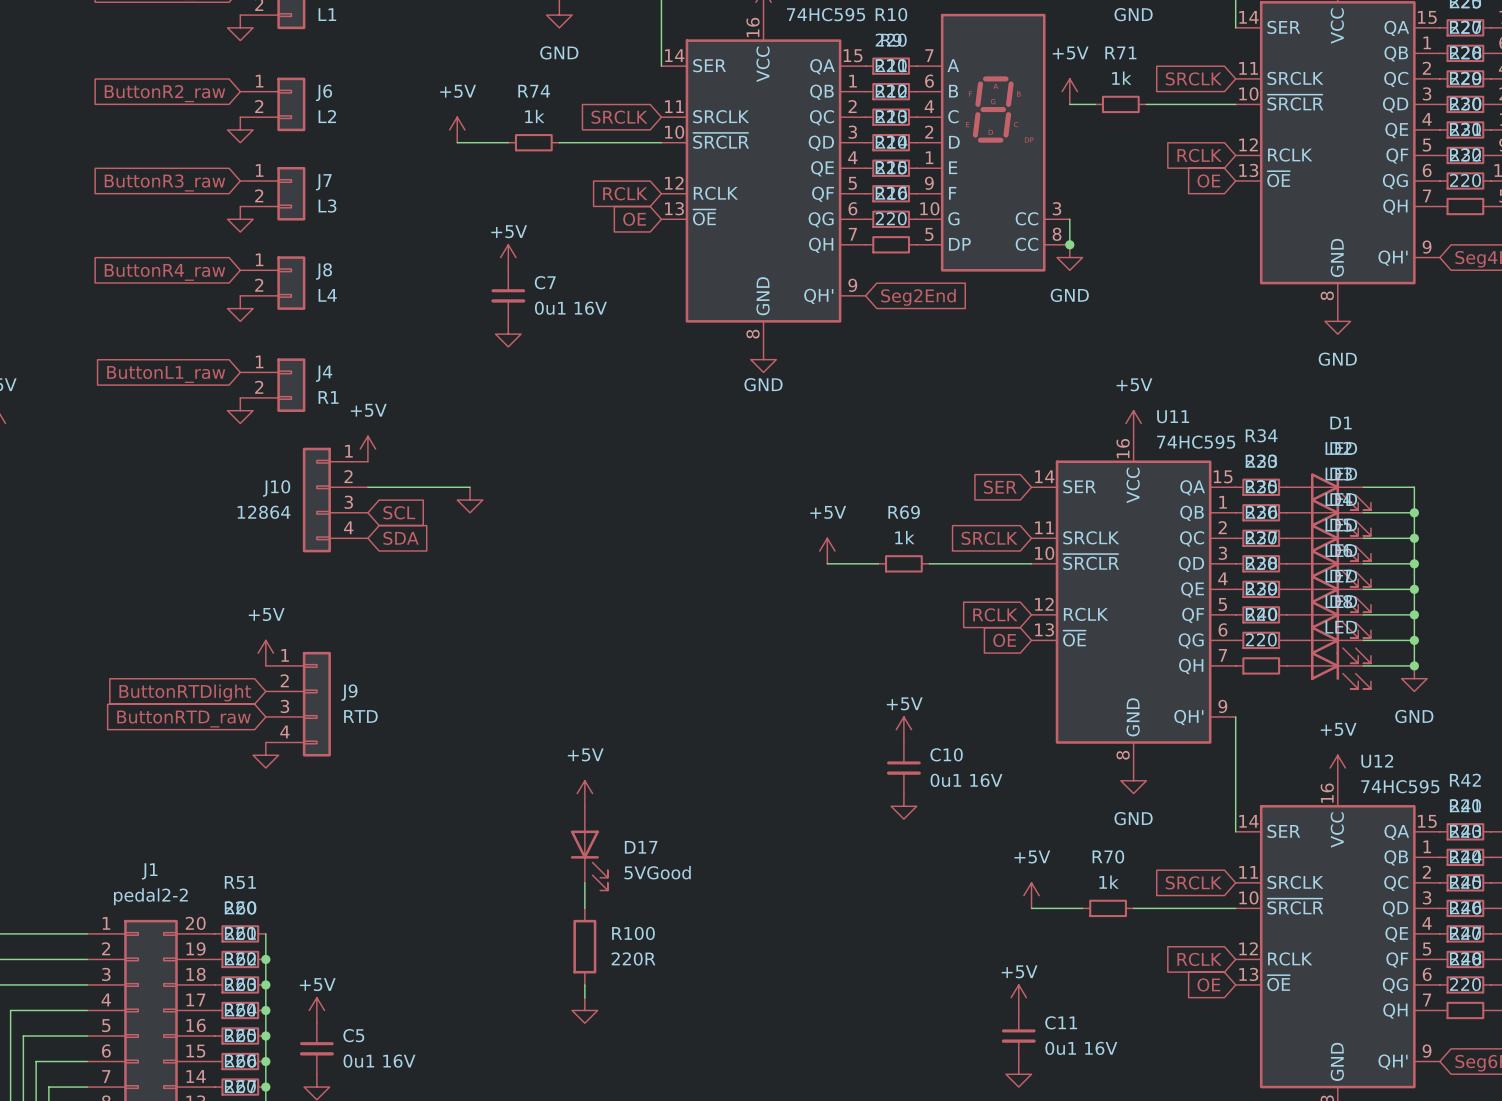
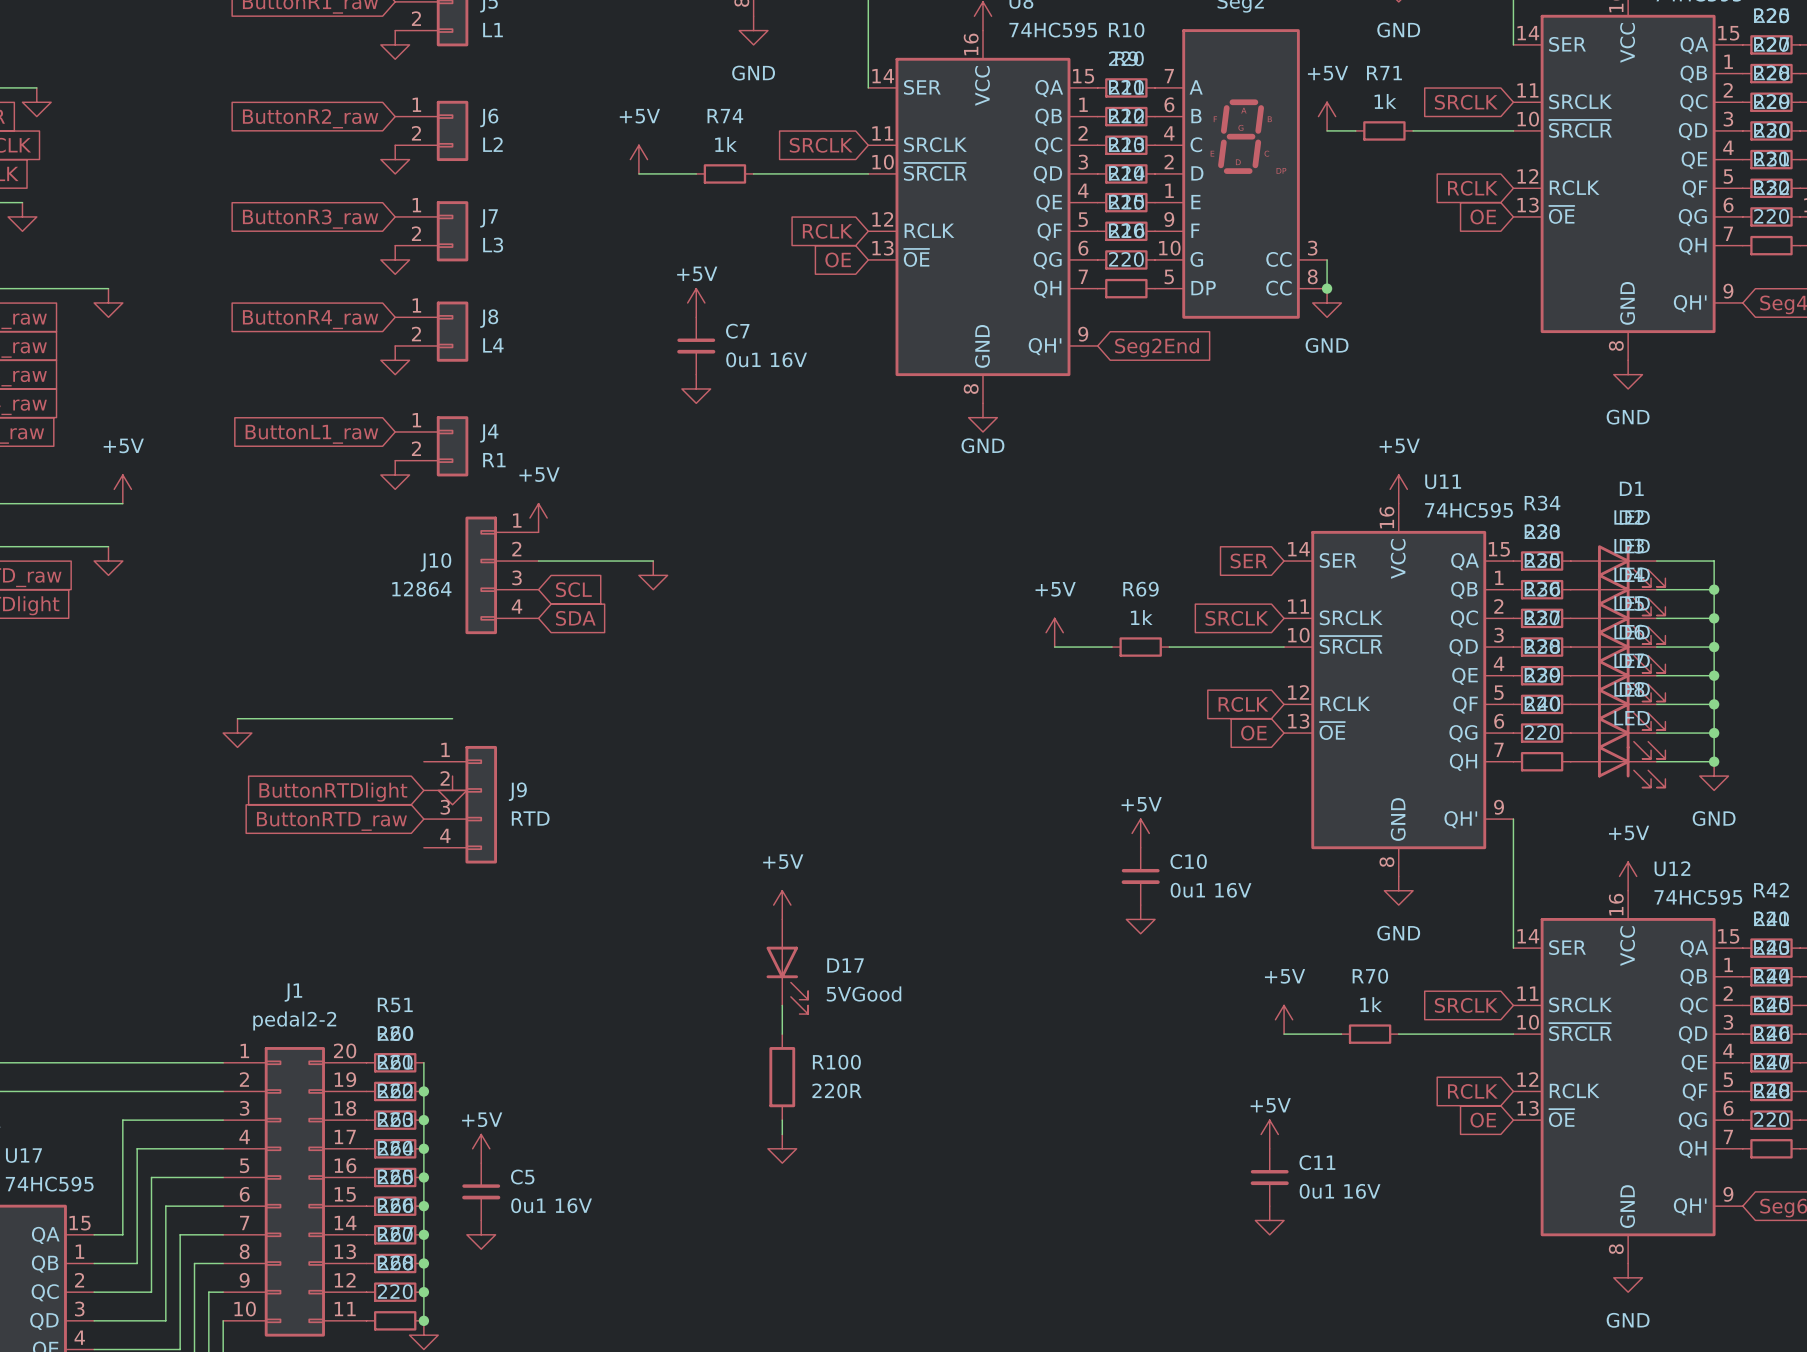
wire: none -> (237, 718) (452, 718)
power symbol: none -> (237, 733)
power symbol: +5V (265, 653) -> none
power symbol position: (265, 755) -> (452, 790)

